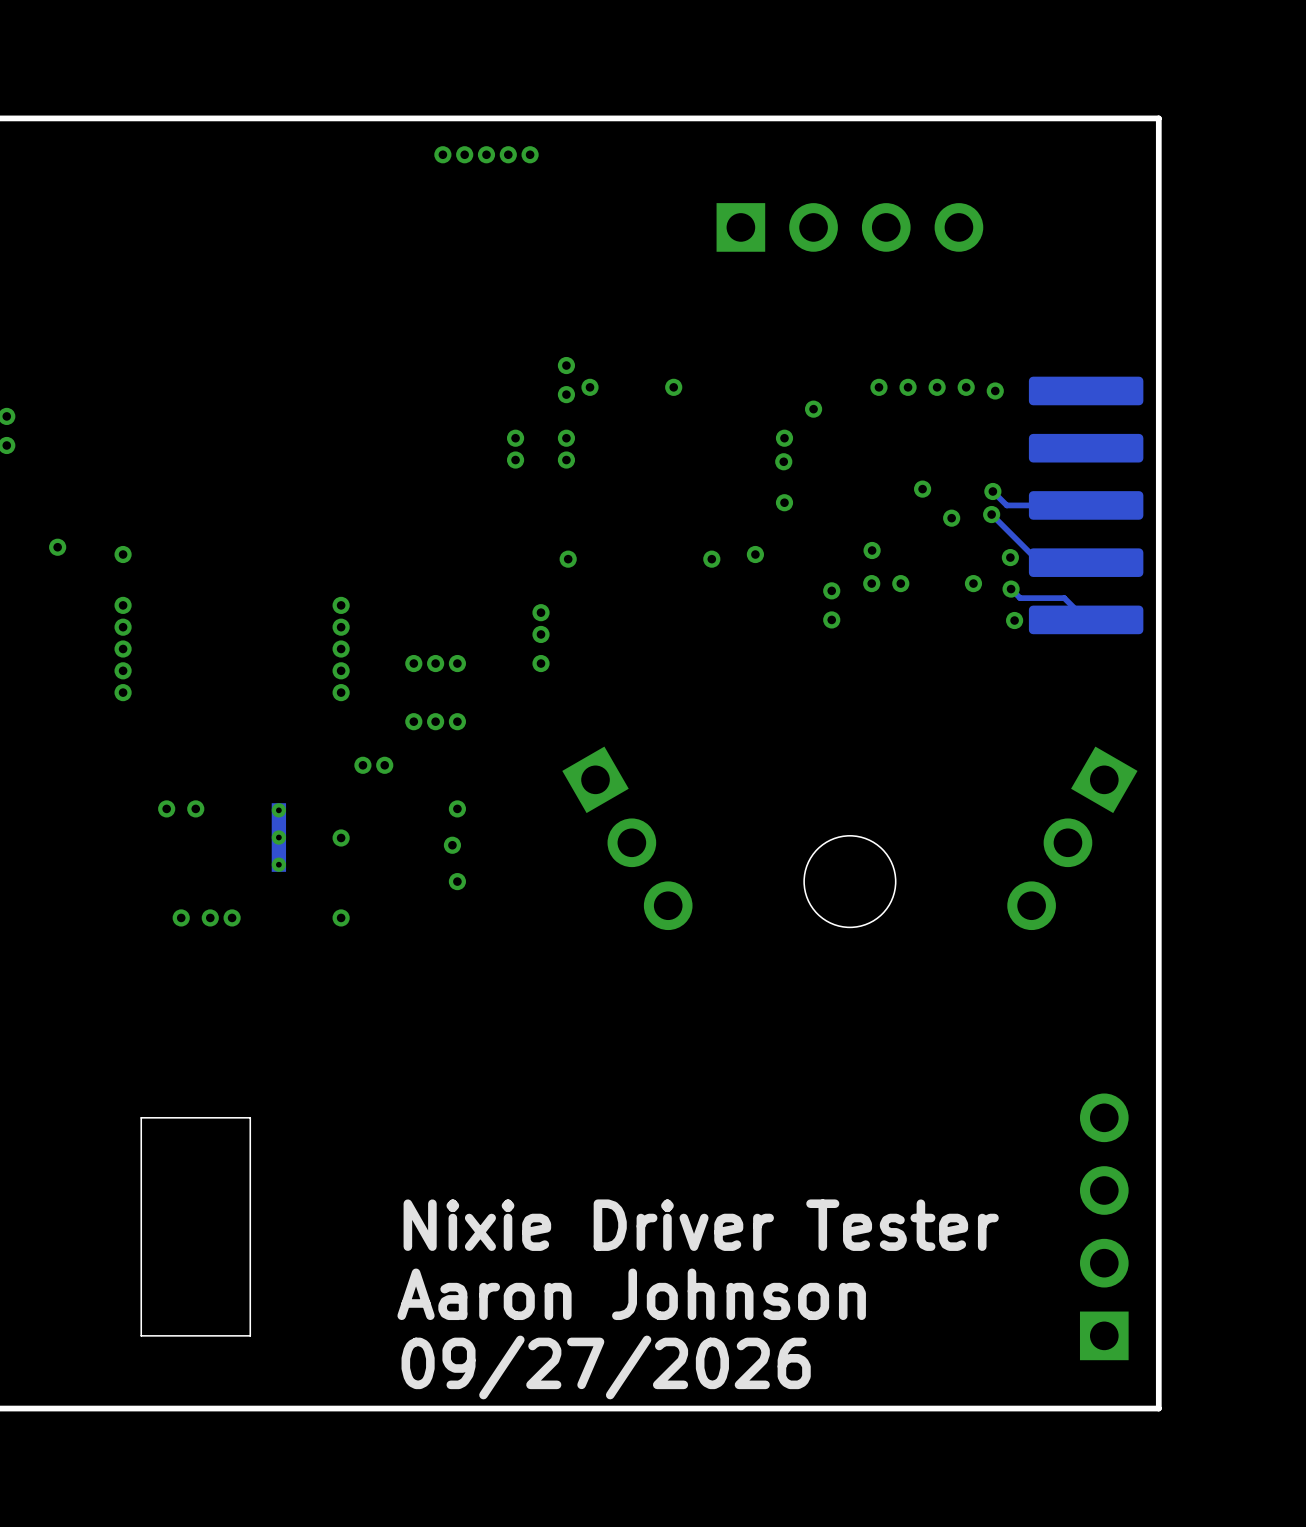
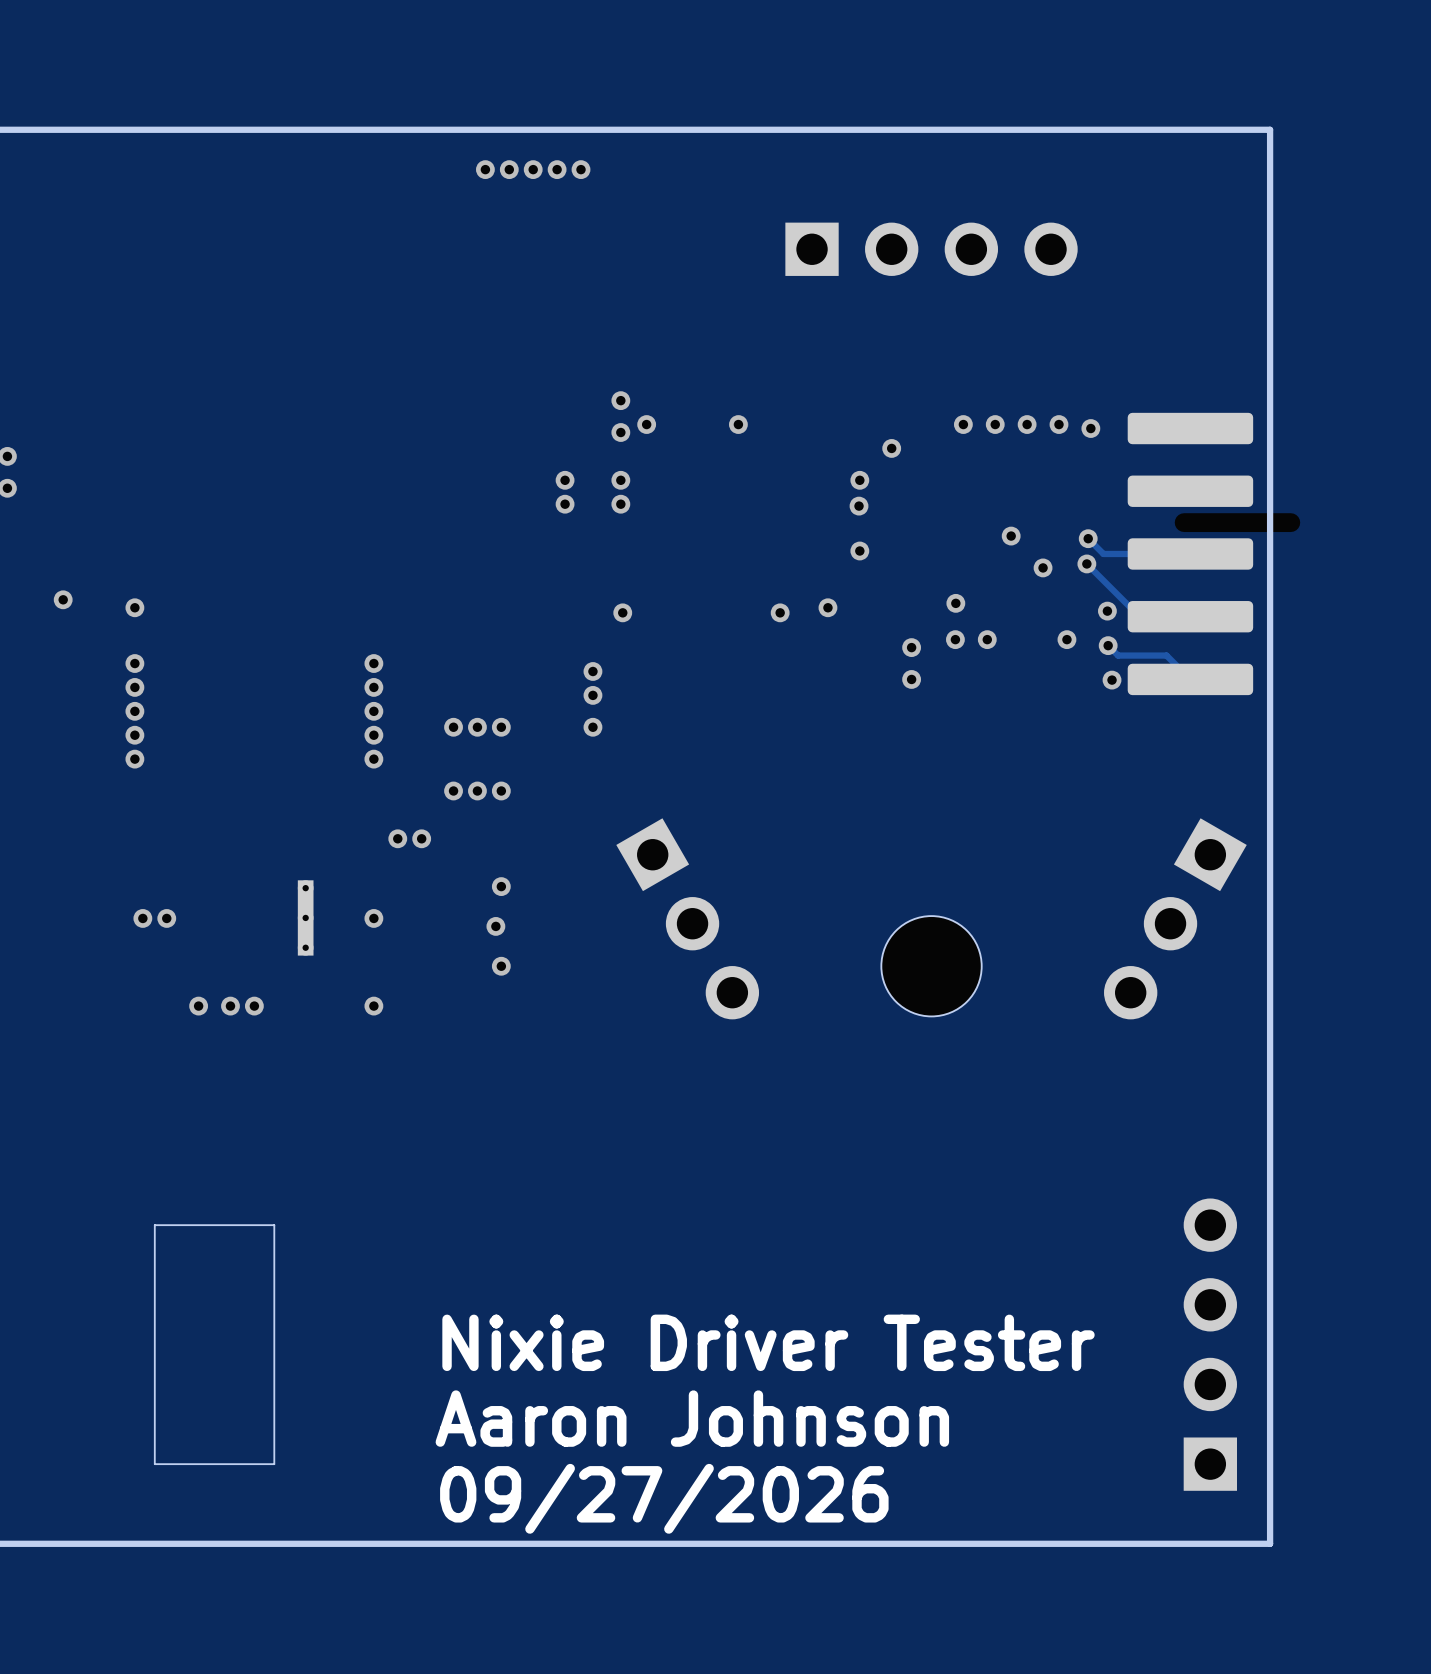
via: (166, 808) -> none
via: (195, 808) -> none
via: none -> (142, 918)
via: none -> (166, 918)

